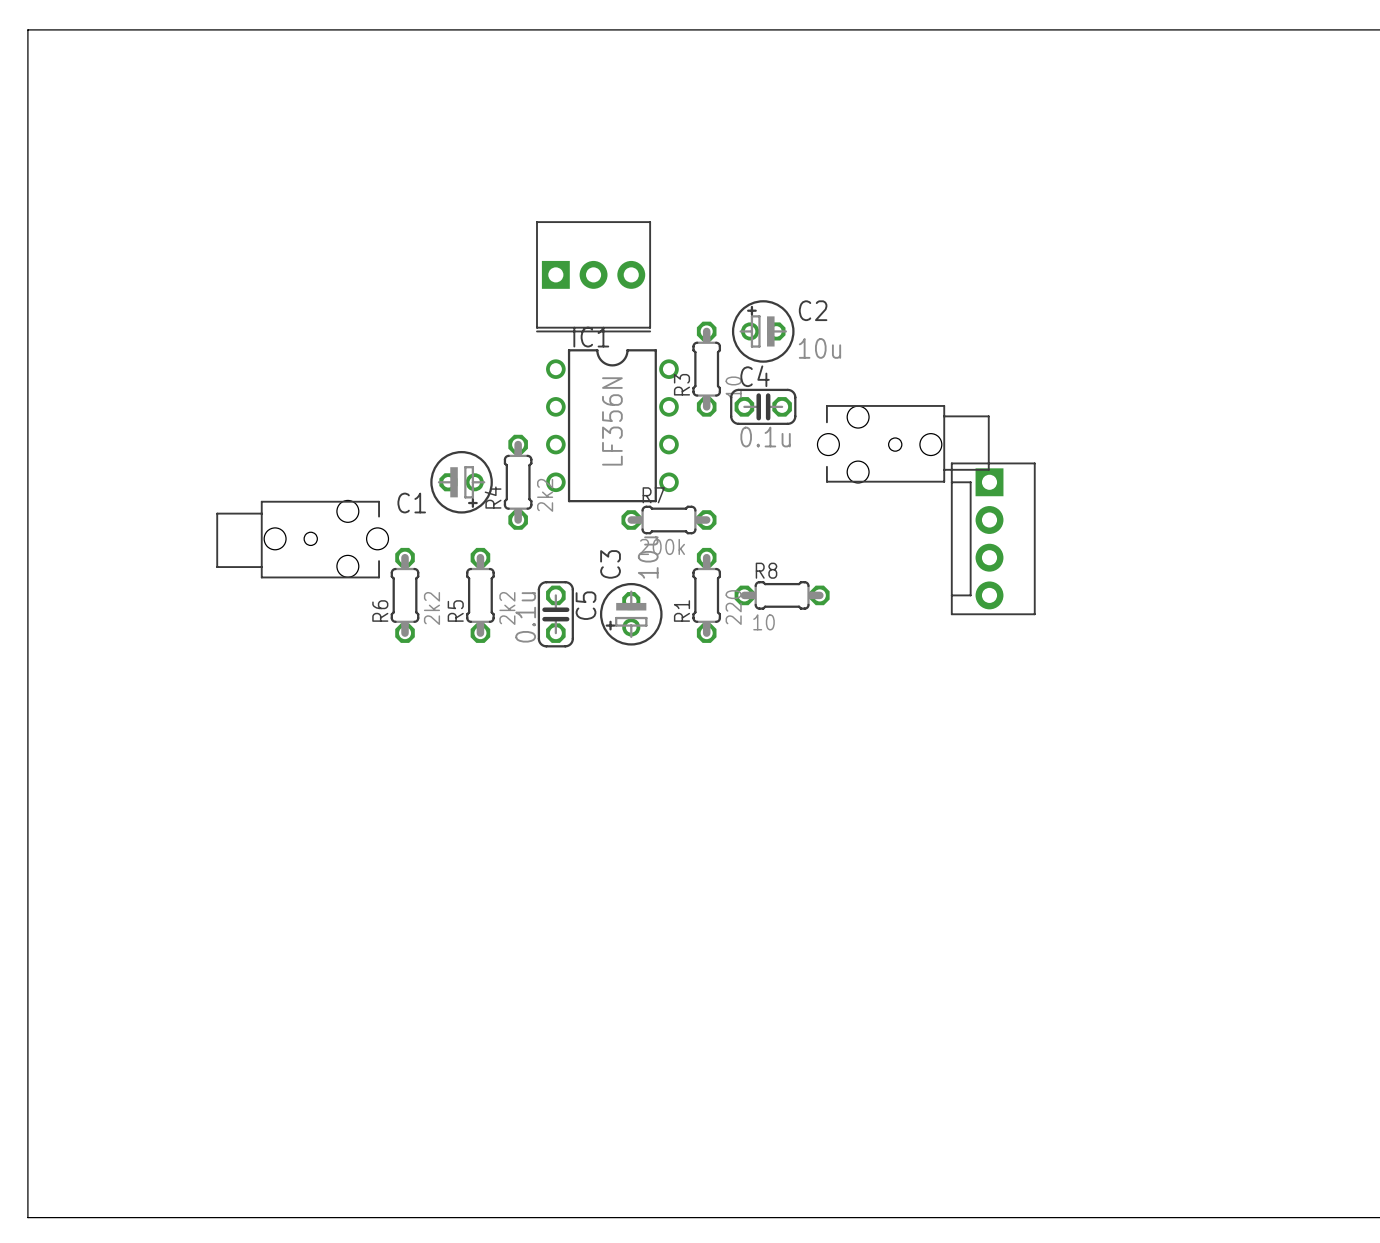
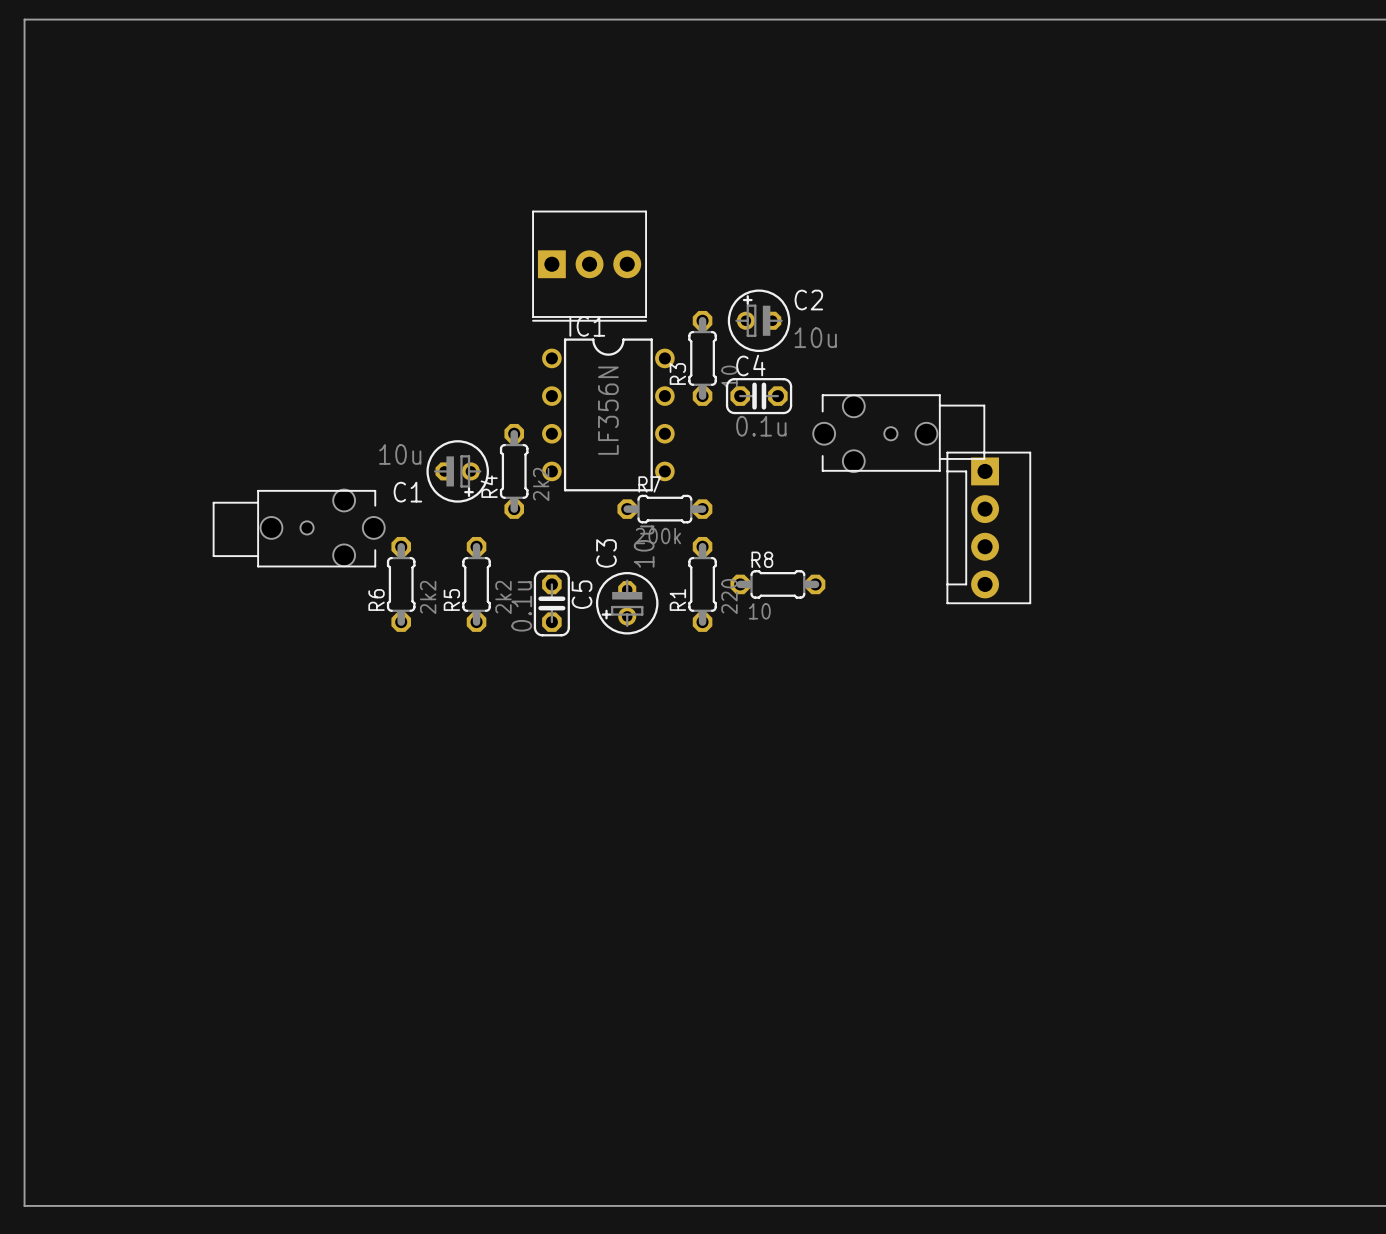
C1 value: none -> 10u (400, 454)

